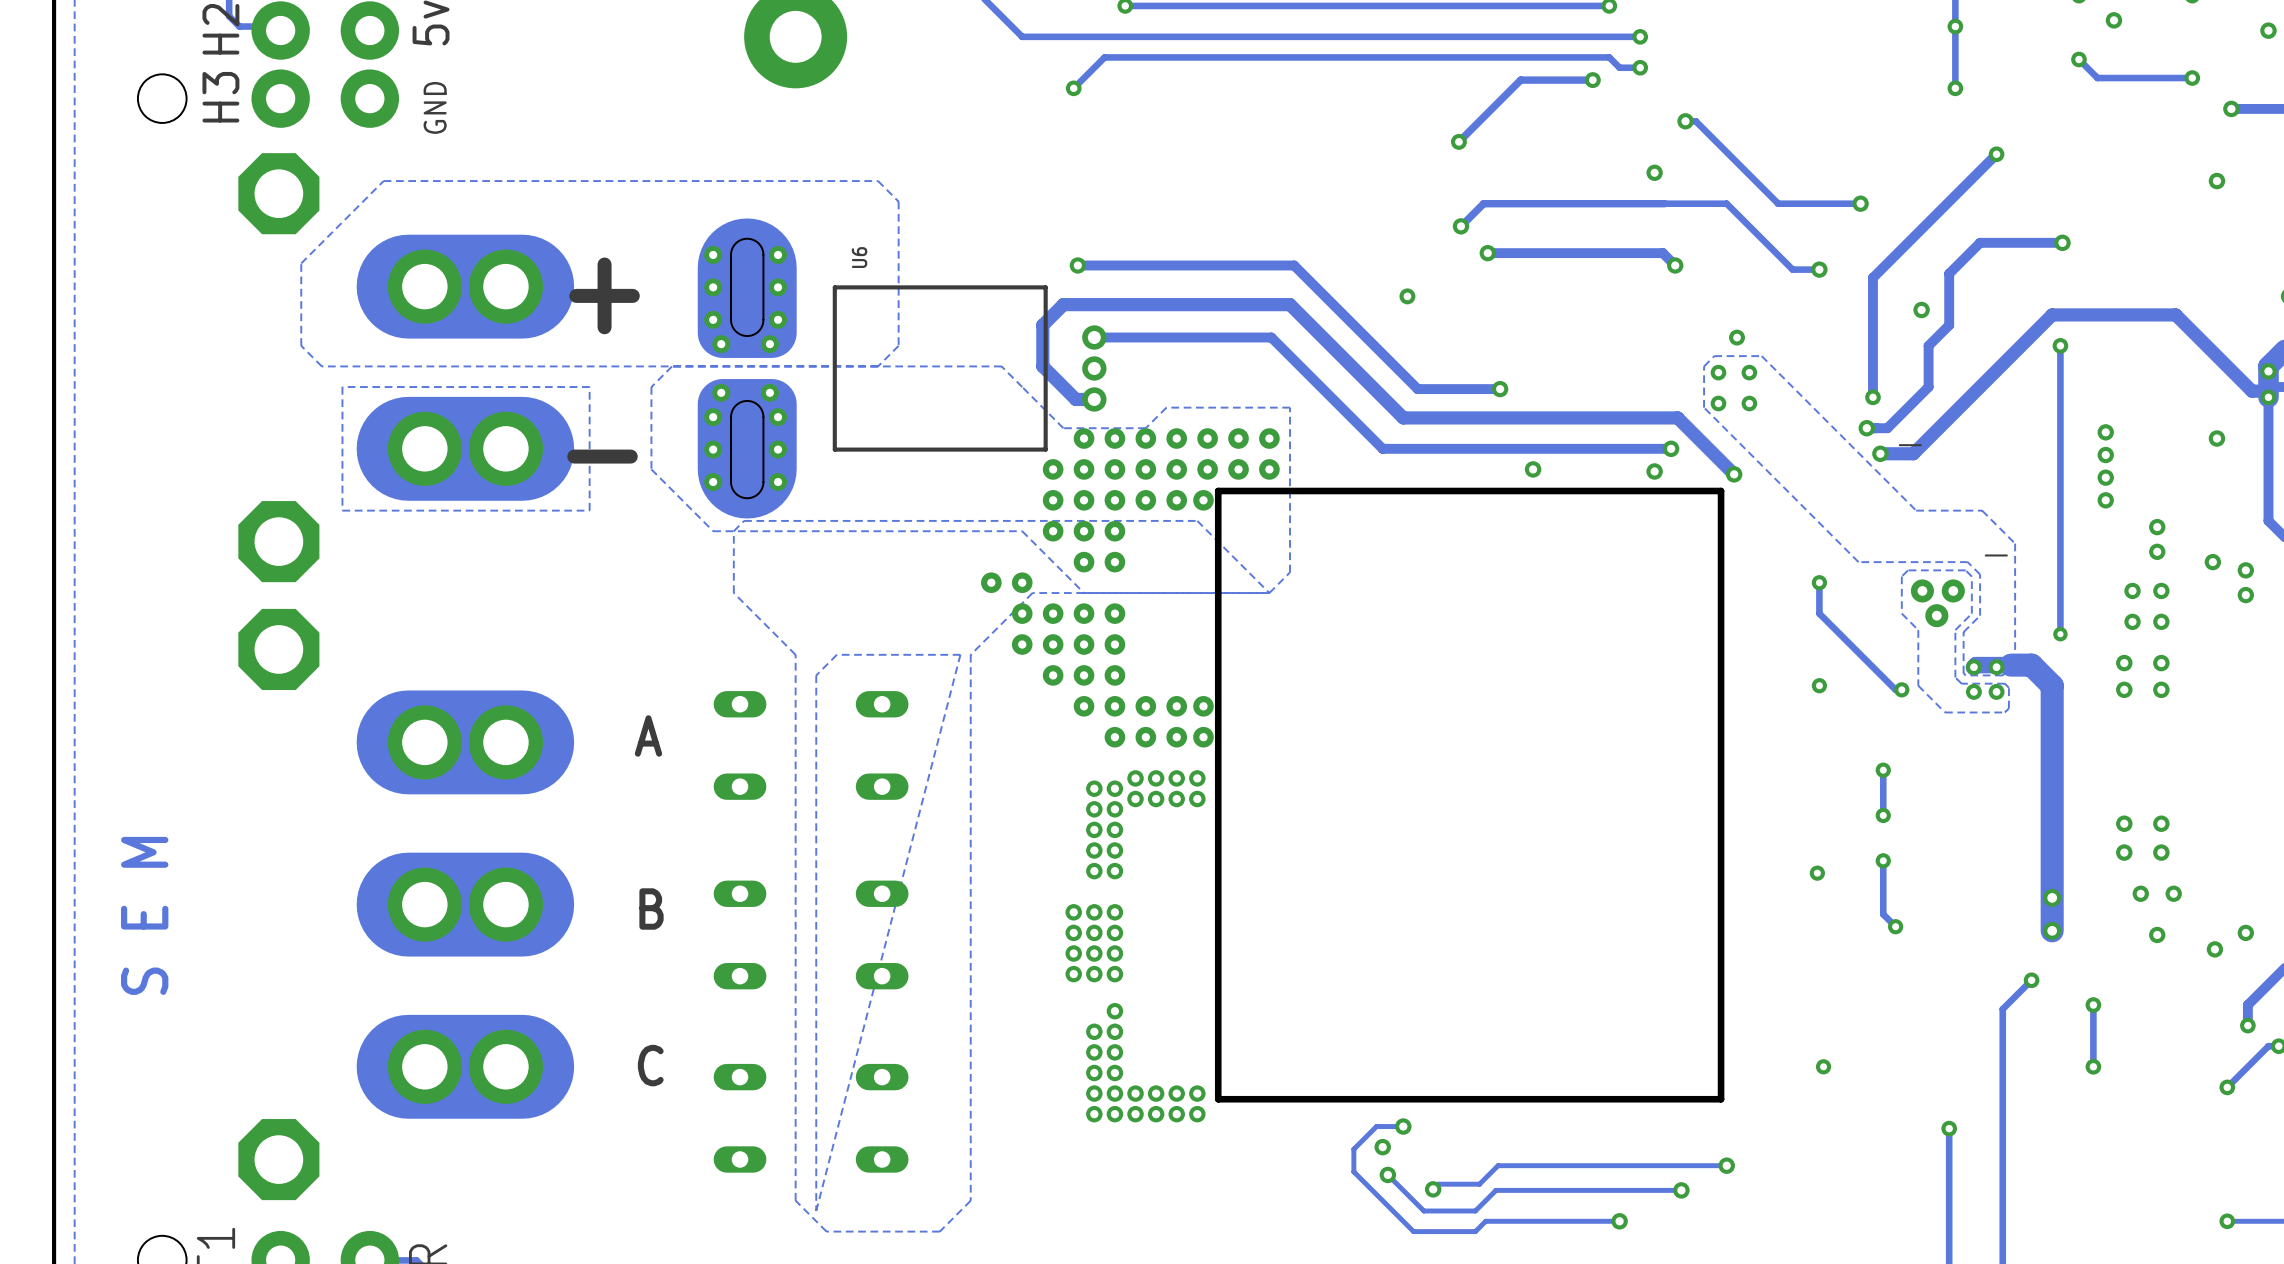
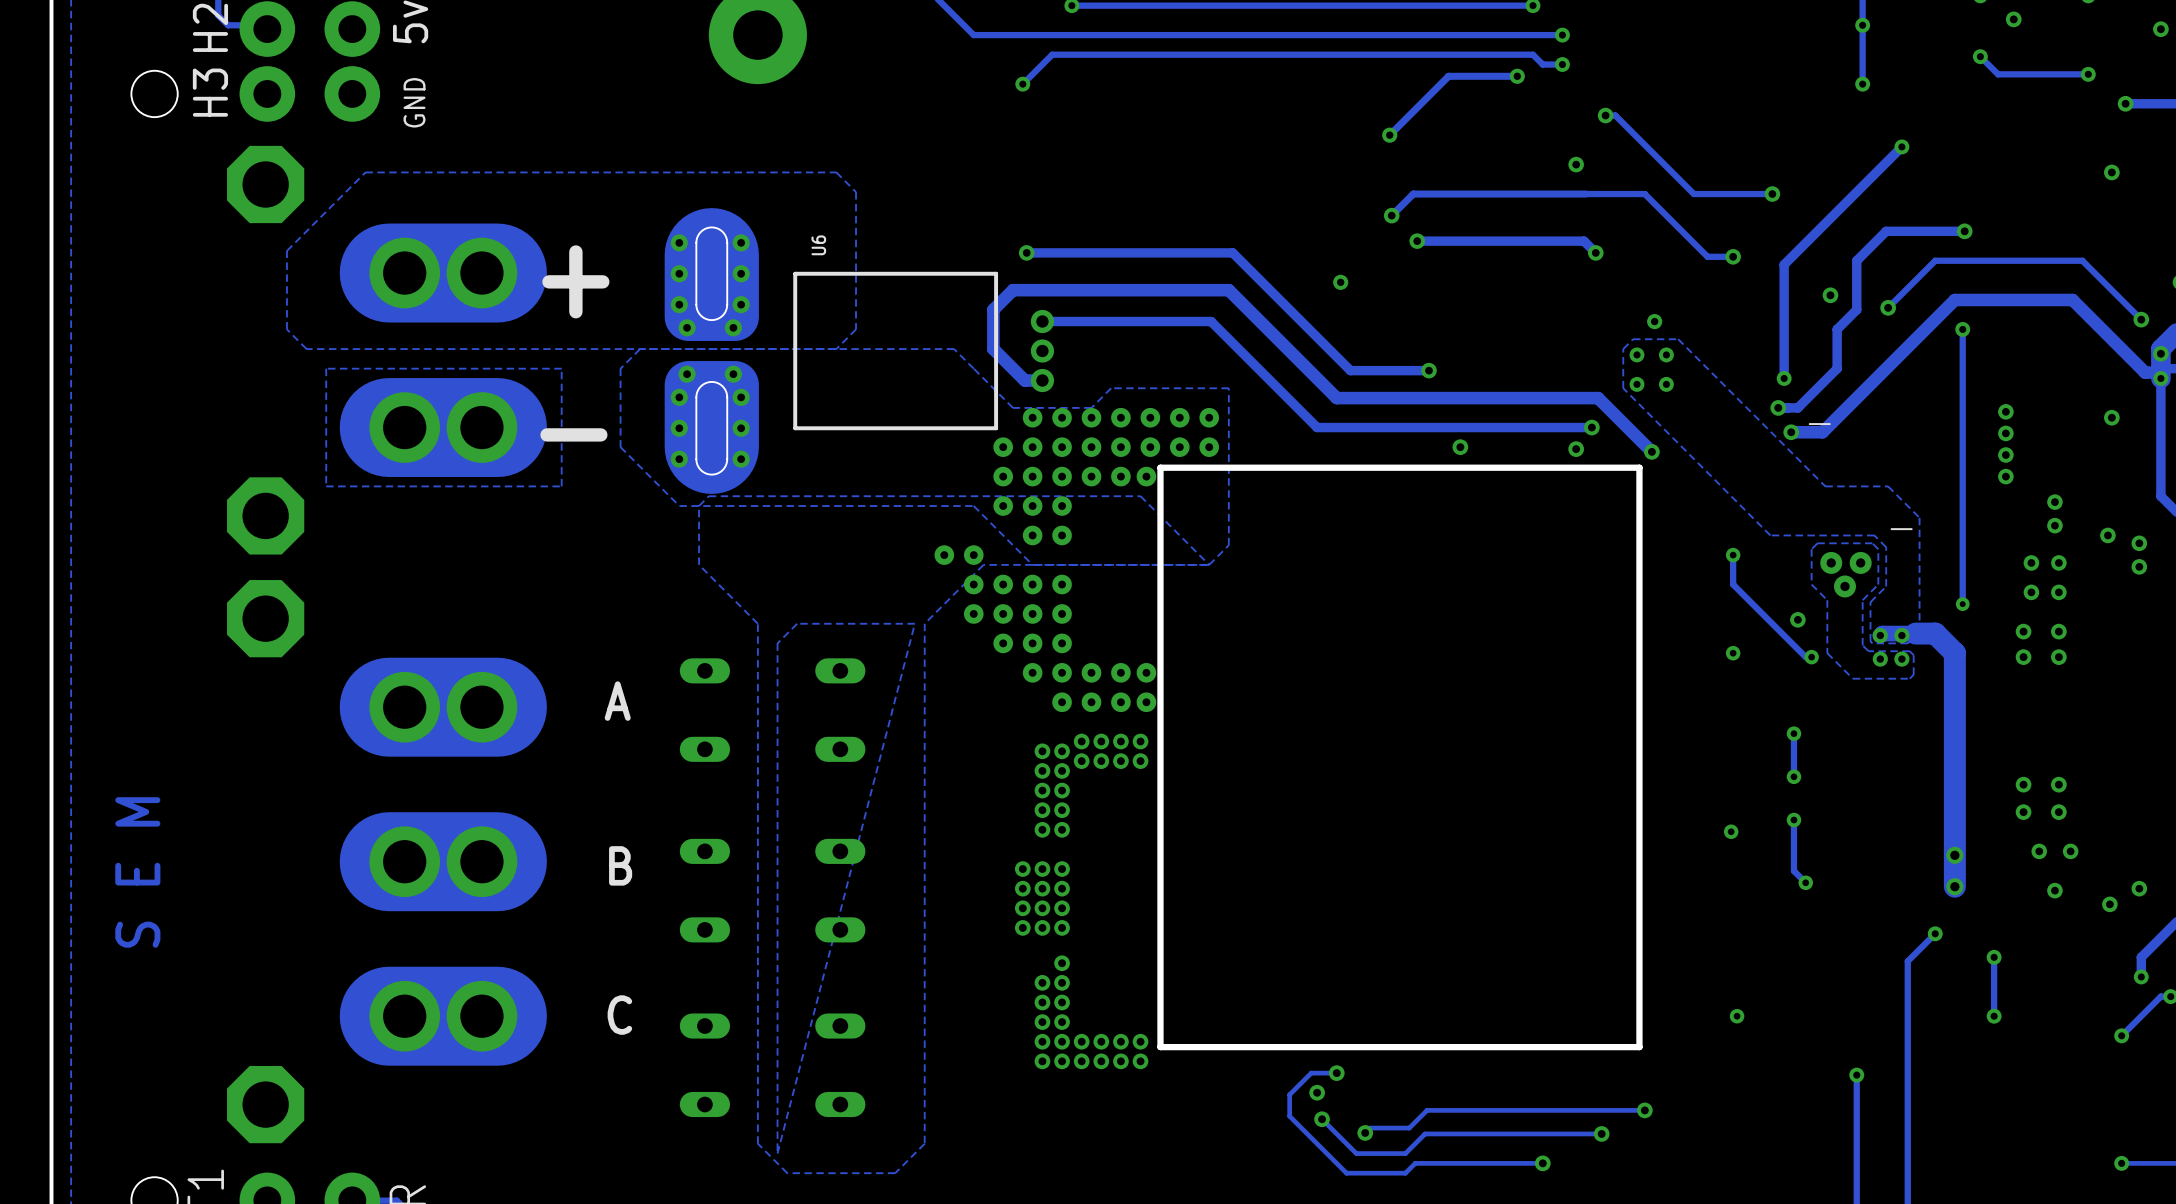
track: none -> (1888, 307) (1935, 260) (2082, 260) (2141, 319)
via: none -> (1888, 307)
via: none -> (2141, 319)
via: none -> (1797, 619)

